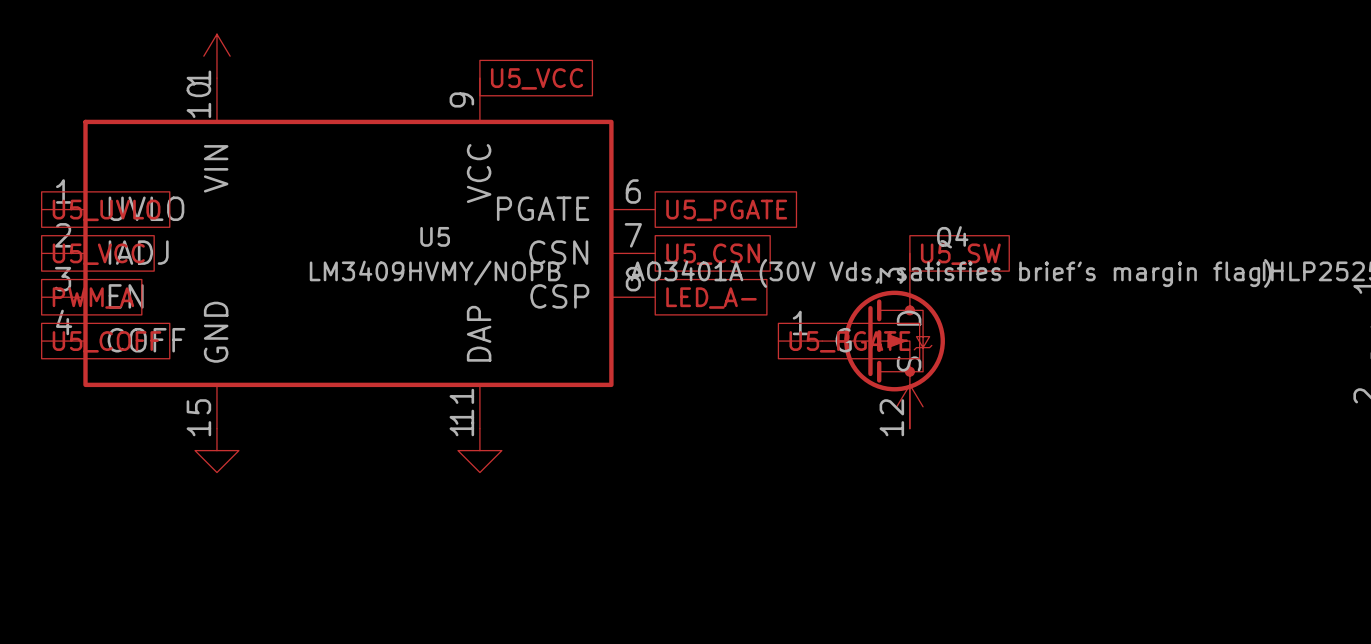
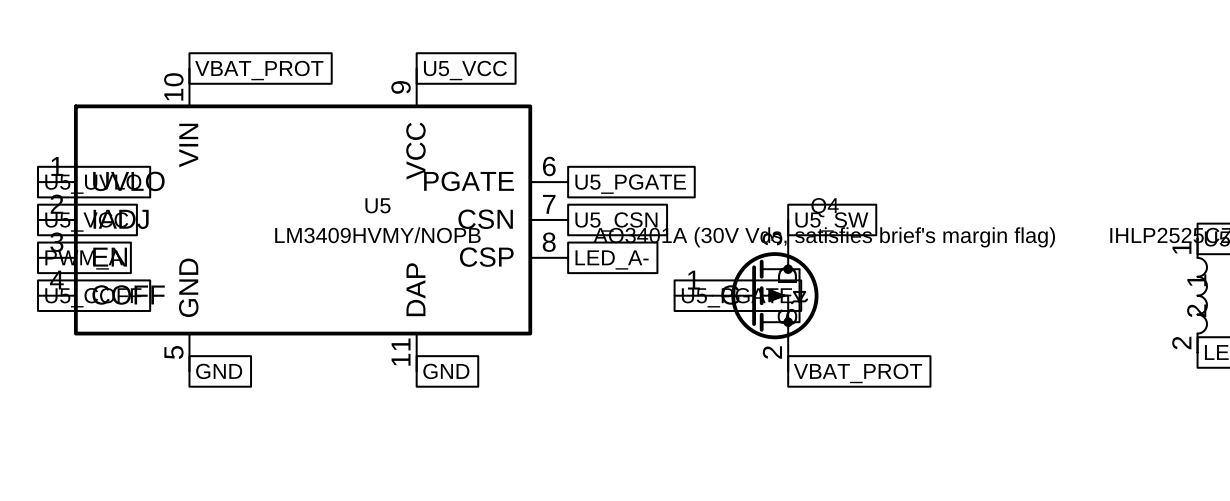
power symbol: (216, 56) -> none
global label: none -> VBAT_PROT (259, 70)
power symbol: (909, 406) -> none
global label: none -> GND (219, 371)
global label: none -> GND (446, 371)
global label: none -> VBAT_PROT (857, 373)
power symbol: (216, 450) -> none
power symbol: (479, 450) -> none

